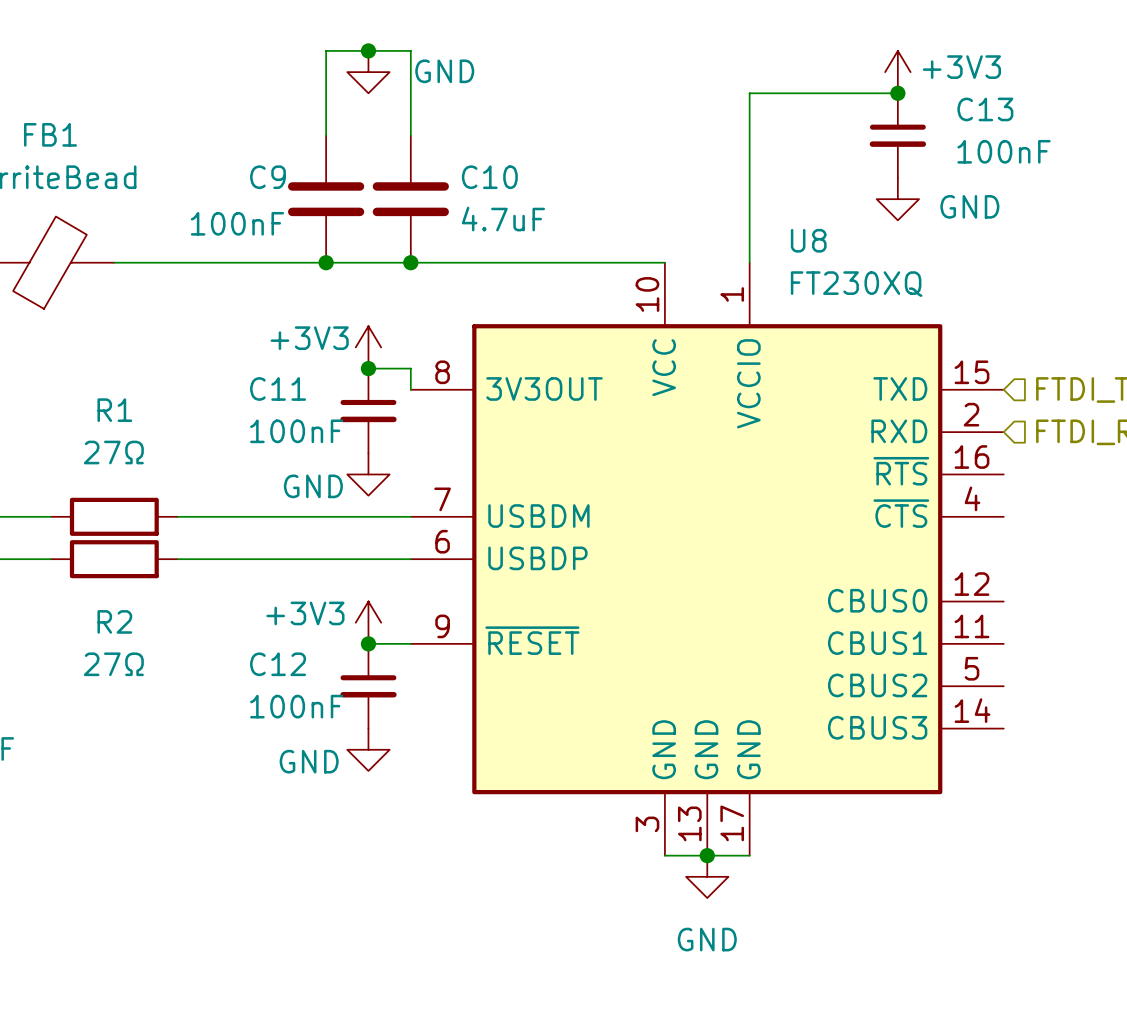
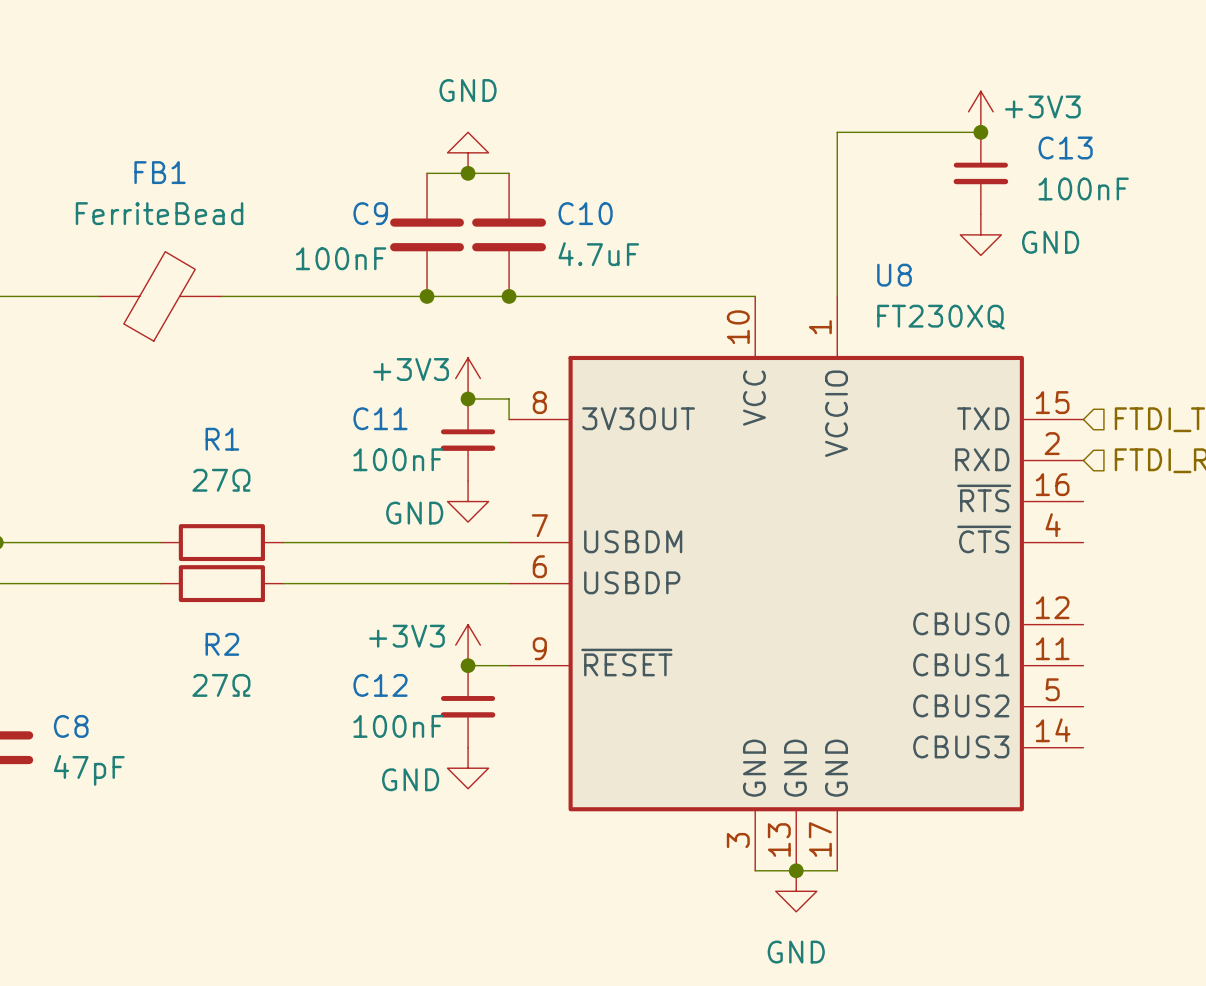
junction position: (368, 50) -> (468, 173)
power symbol text position: GND (444, 71) -> GND (468, 90)
power symbol rotation: 0° (368, 72) -> 180° (468, 152)
power symbol position: GND (368, 72) -> GND (468, 152)
wire: (326, 135) (326, 50) (410, 50) (410, 135) -> (427, 173) (509, 173)

